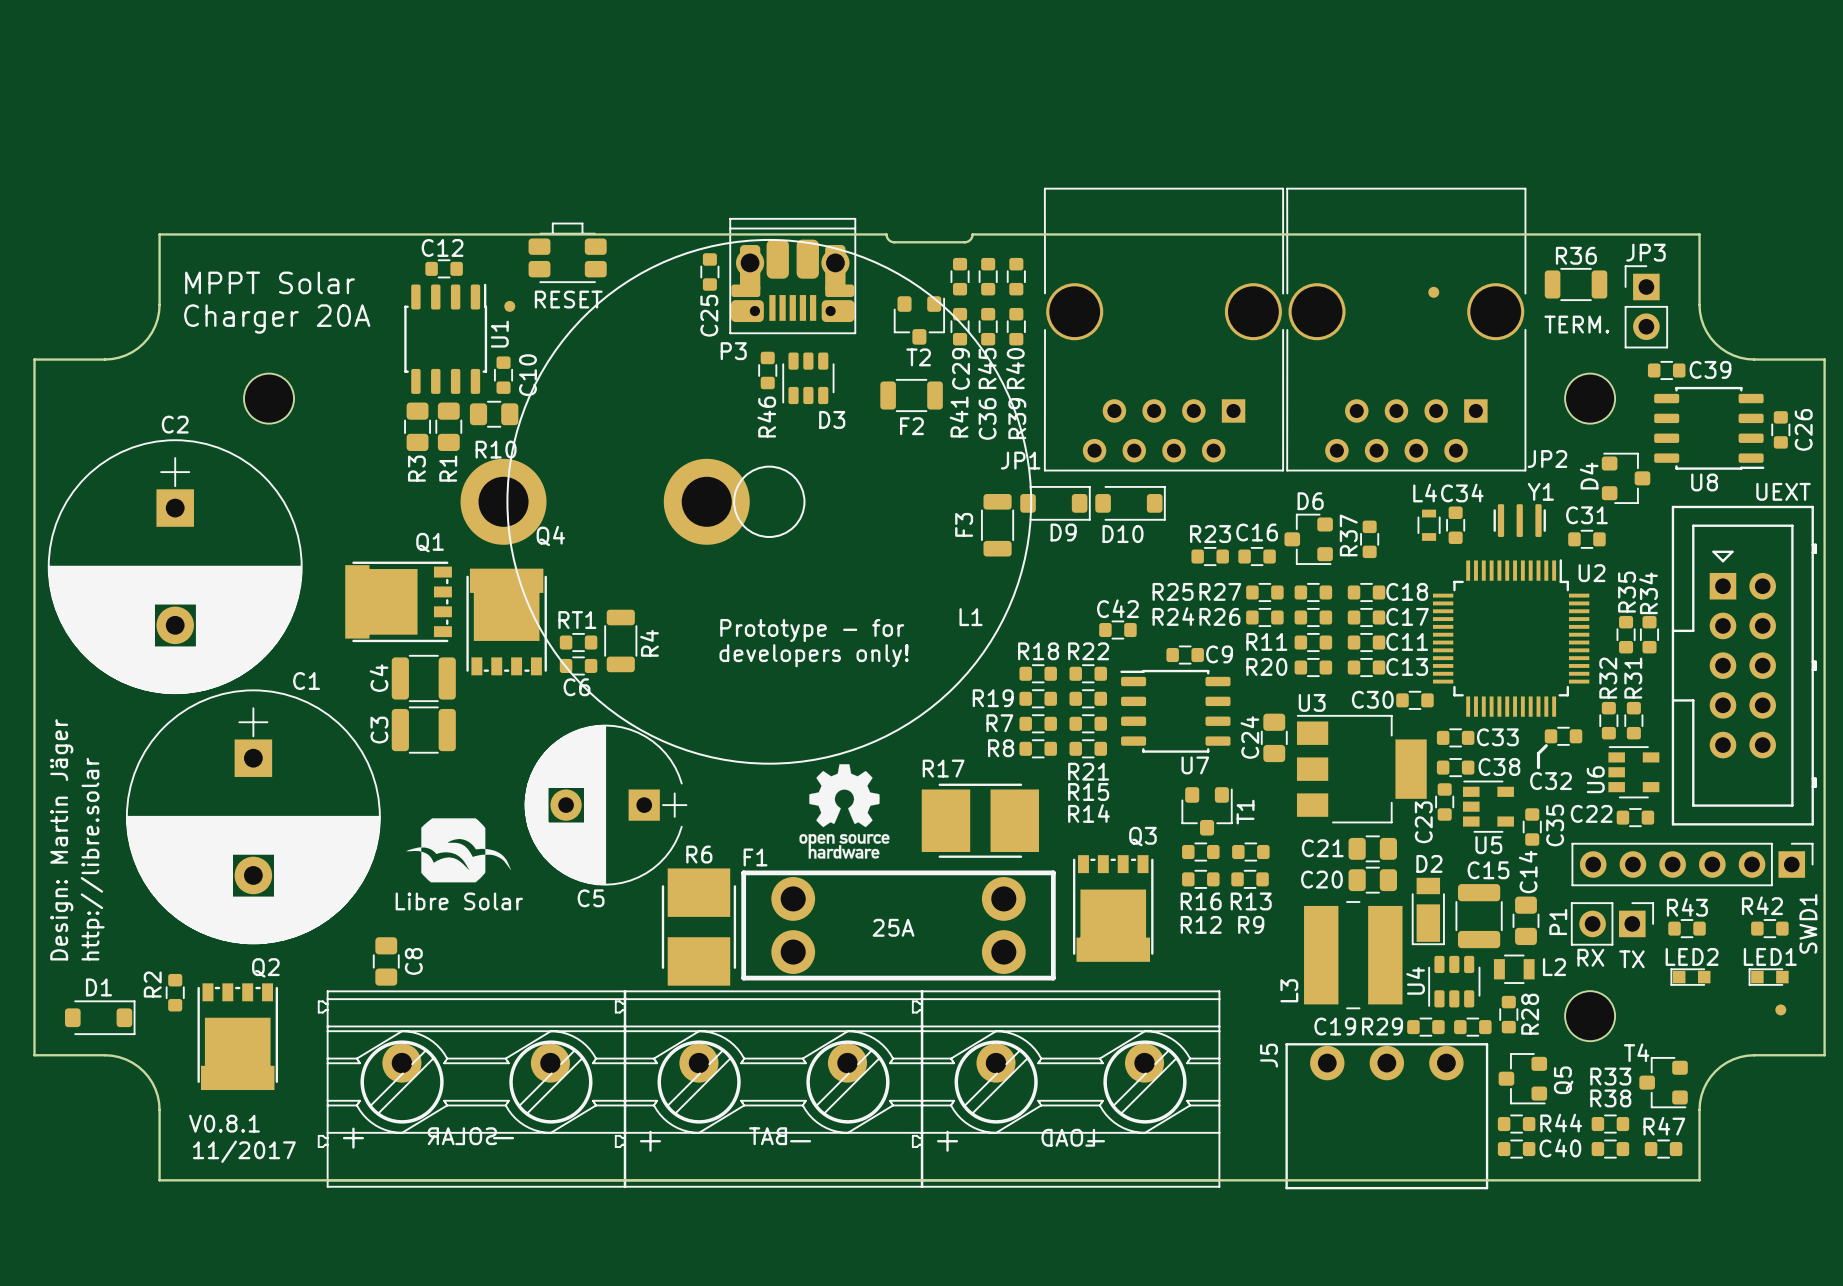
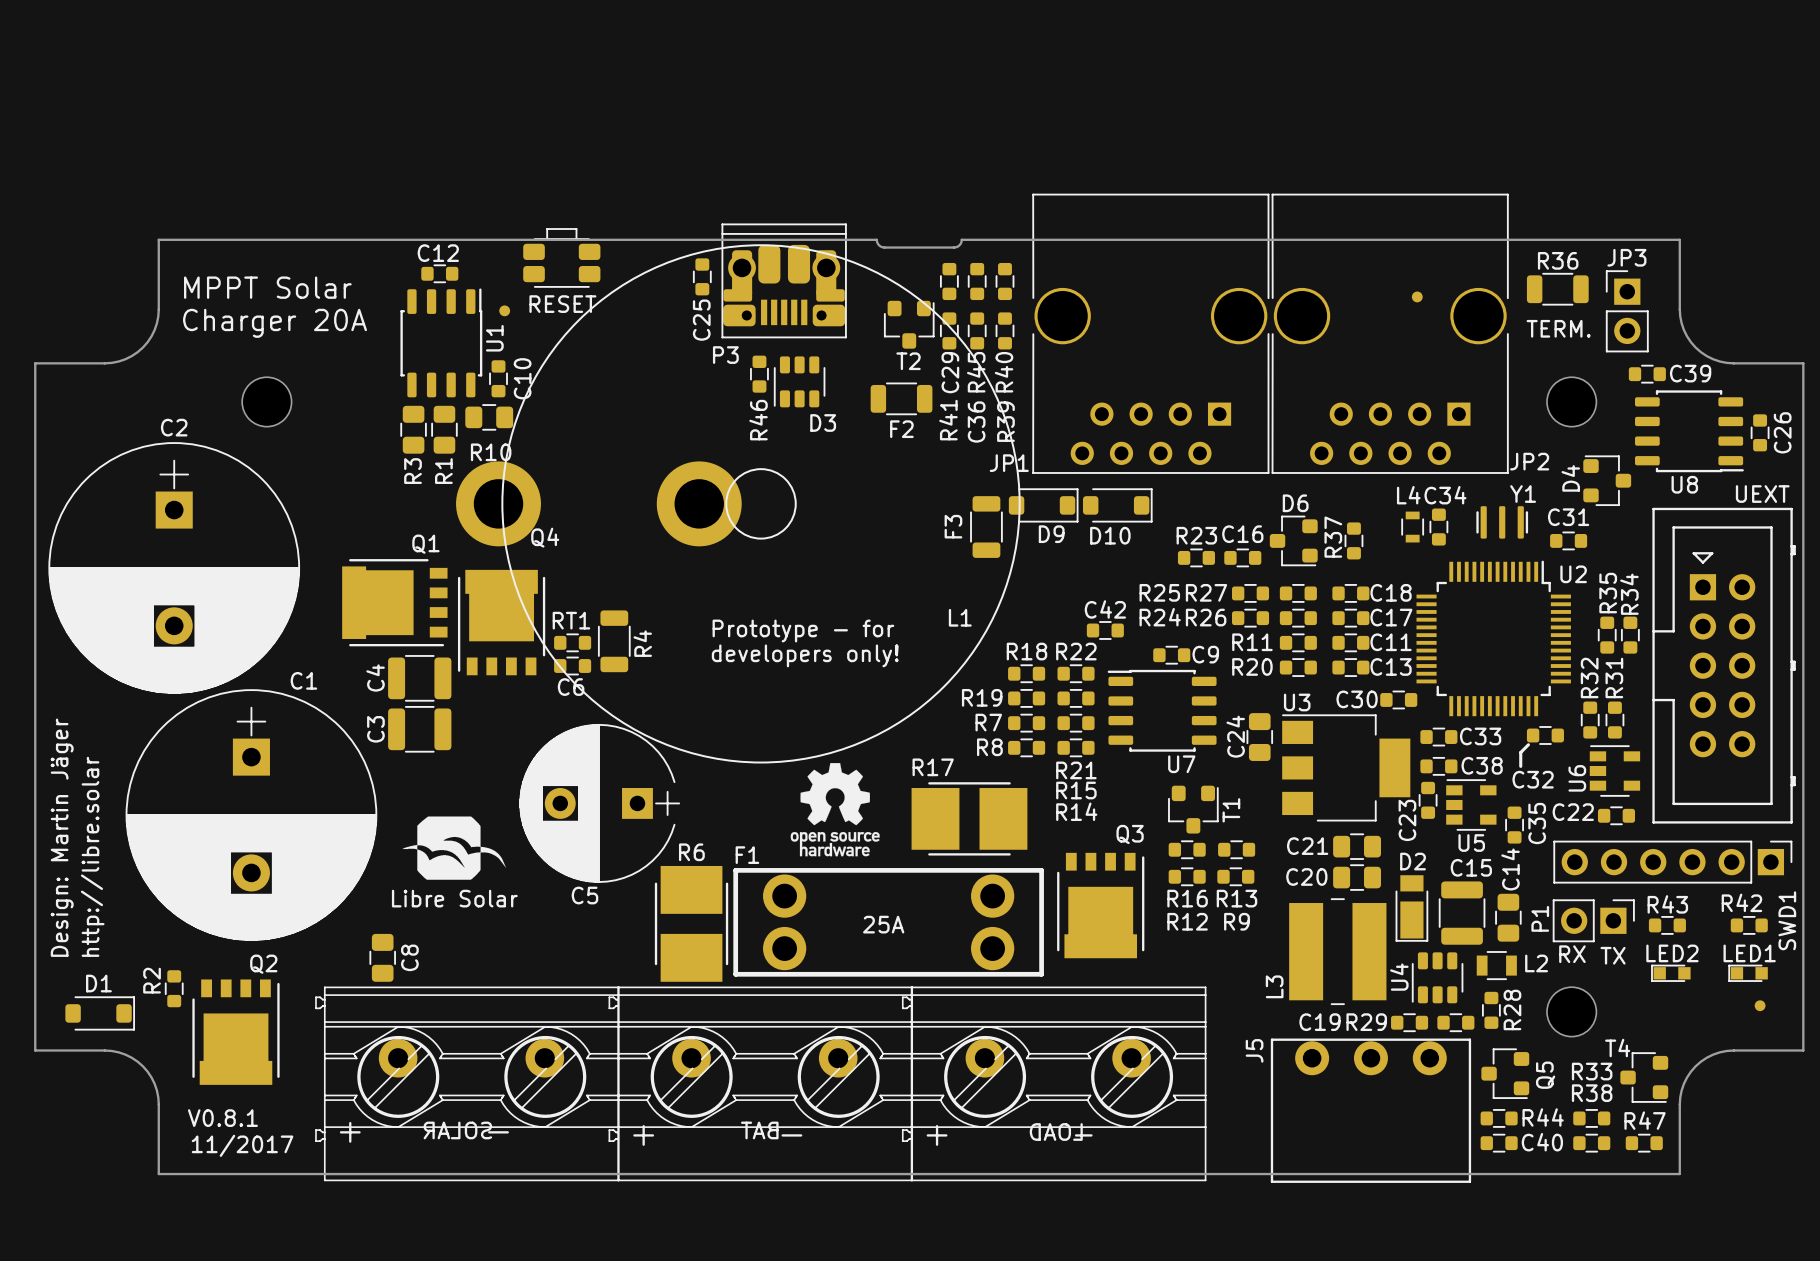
Q1 footprint: [345, 561, 452, 643] -> [342, 559, 448, 647]
Q4 footprint: [466, 568, 547, 676] -> [457, 569, 546, 676]
Q3 footprint: [1072, 855, 1154, 962] -> [1057, 852, 1145, 959]
Q2 footprint: [197, 983, 279, 1091] -> [192, 979, 280, 1085]

